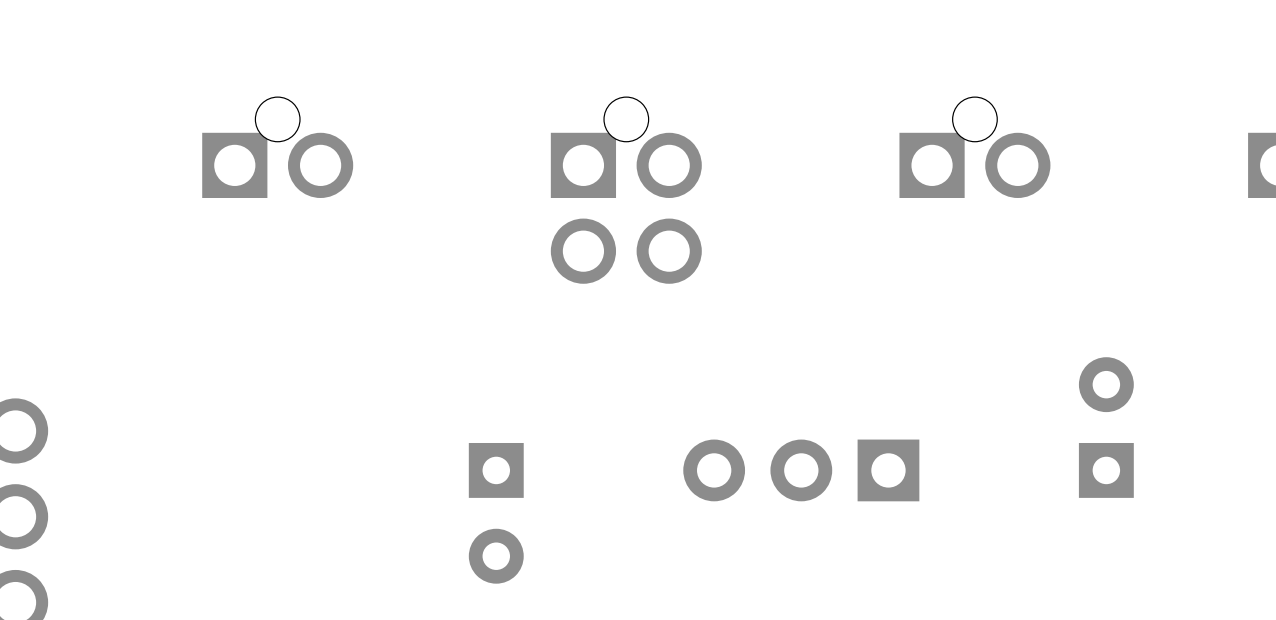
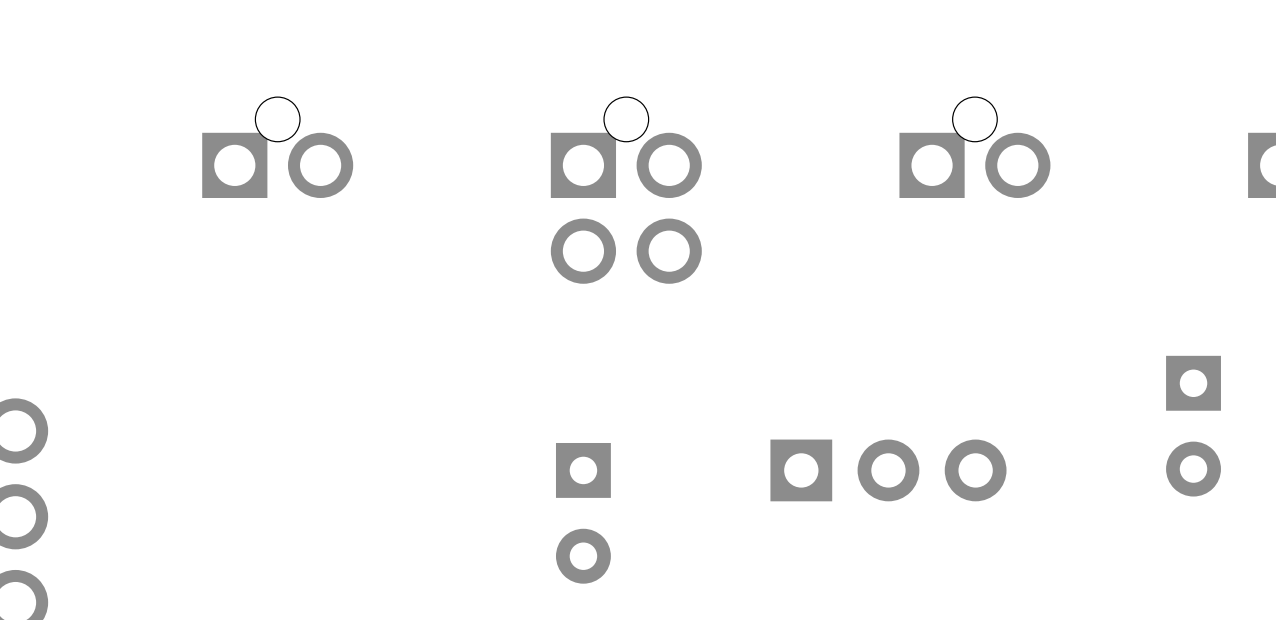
part rotation: 0° (1106, 427) -> 180° (1193, 426)
part position: (1106, 427) -> (1193, 426)
part rotation: 0° (801, 470) -> 180° (888, 470)
part position: (496, 513) -> (583, 513)

